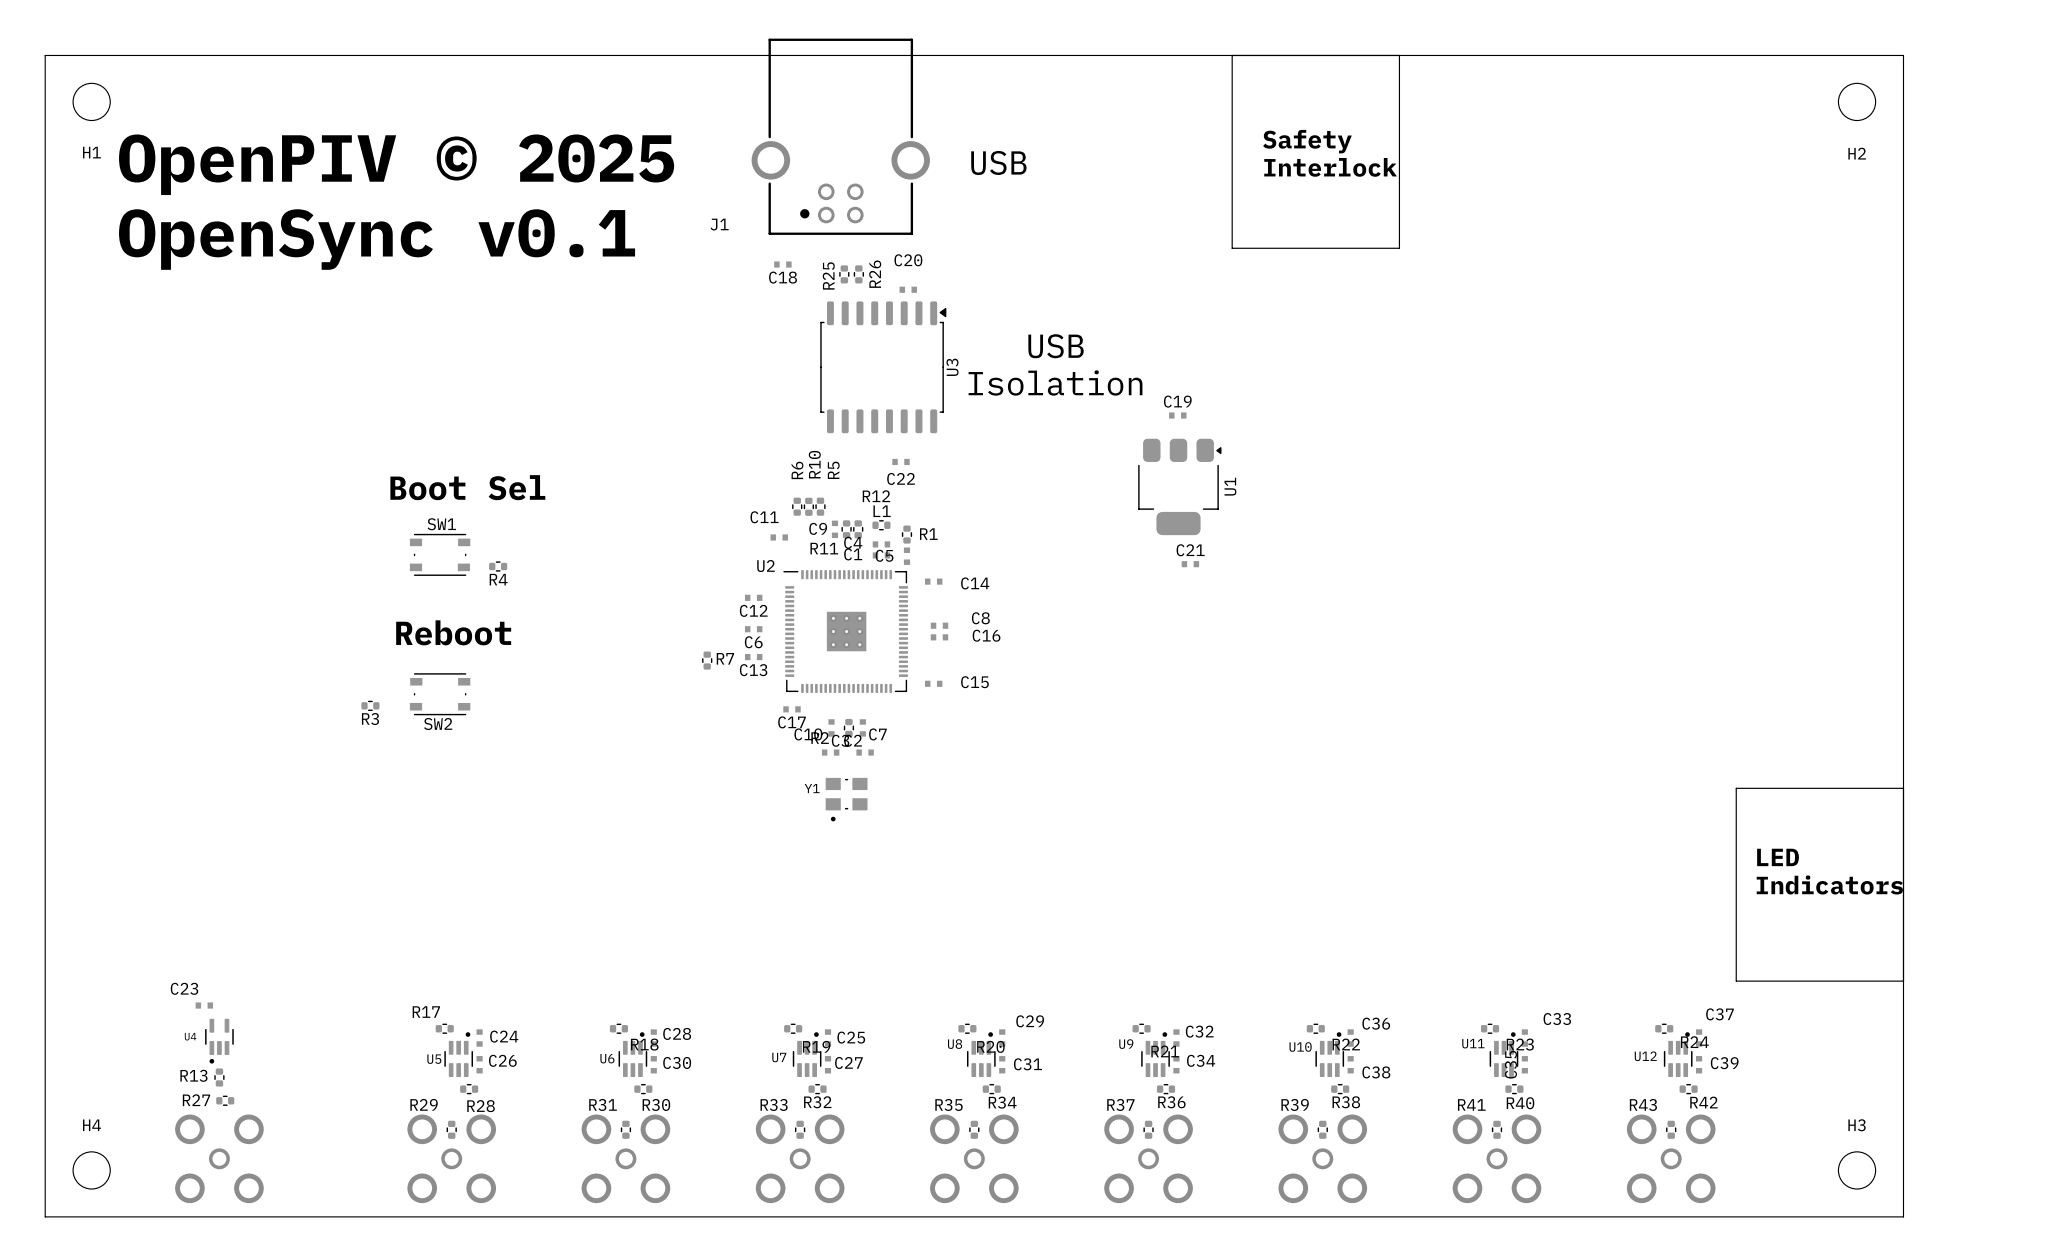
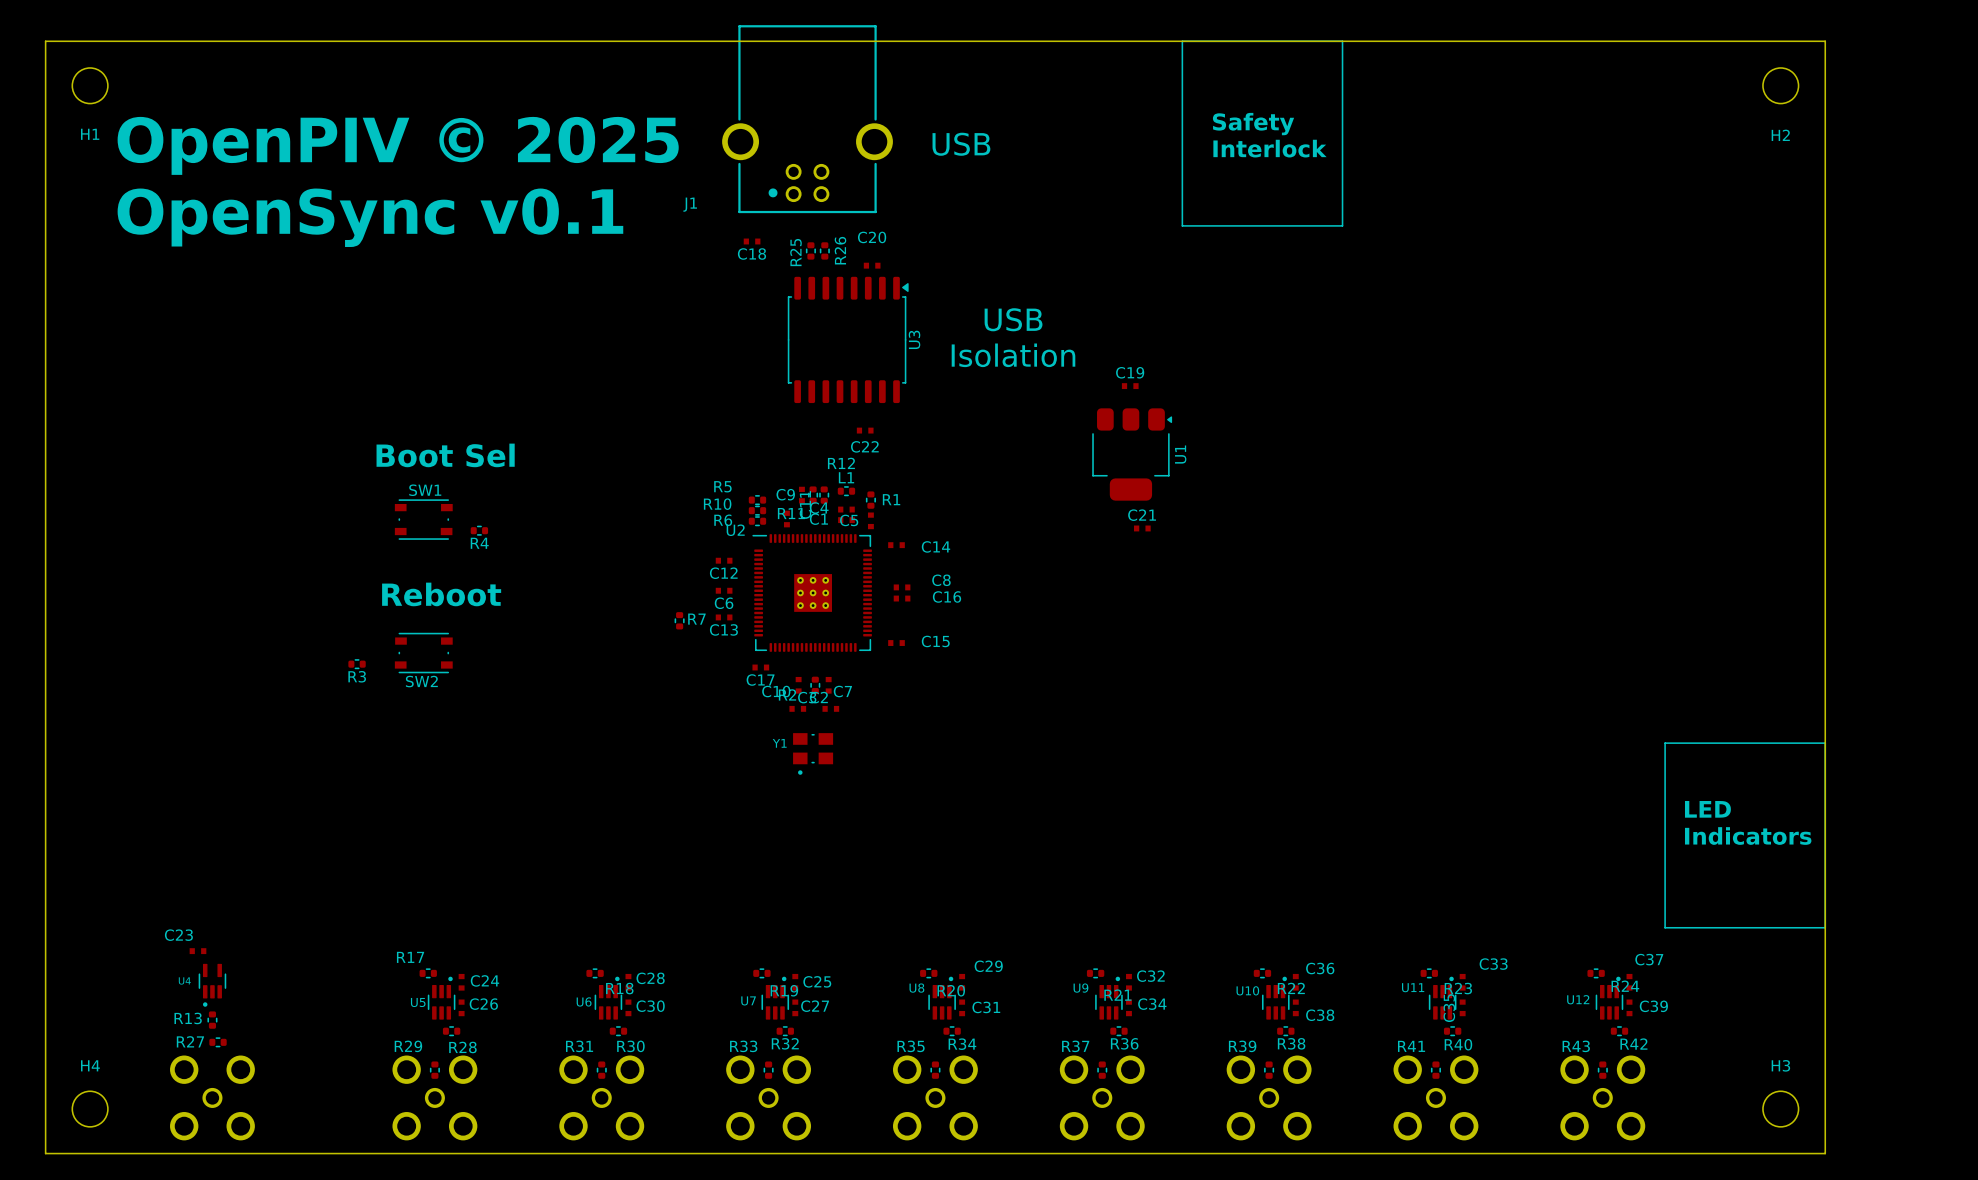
R10 name position: R10 (814, 464) -> R10 (717, 504)
R6 name position: R6 (797, 470) -> R6 (723, 520)
R5 name position: R5 (833, 470) -> R5 (722, 486)
R6 rotation: 0° (797, 506) -> 90° clockwise (757, 521)
R6 position: (797, 506) -> (757, 521)
R10 rotation: 0° (808, 506) -> 90° clockwise (757, 510)
R10 position: (808, 506) -> (757, 510)
R5 rotation: 0° (820, 506) -> 90° clockwise (757, 500)
R5 position: (820, 506) -> (757, 500)
C11 rotation: 0° (779, 537) -> 90° clockwise (786, 519)
C11 position: (779, 537) -> (786, 519)

